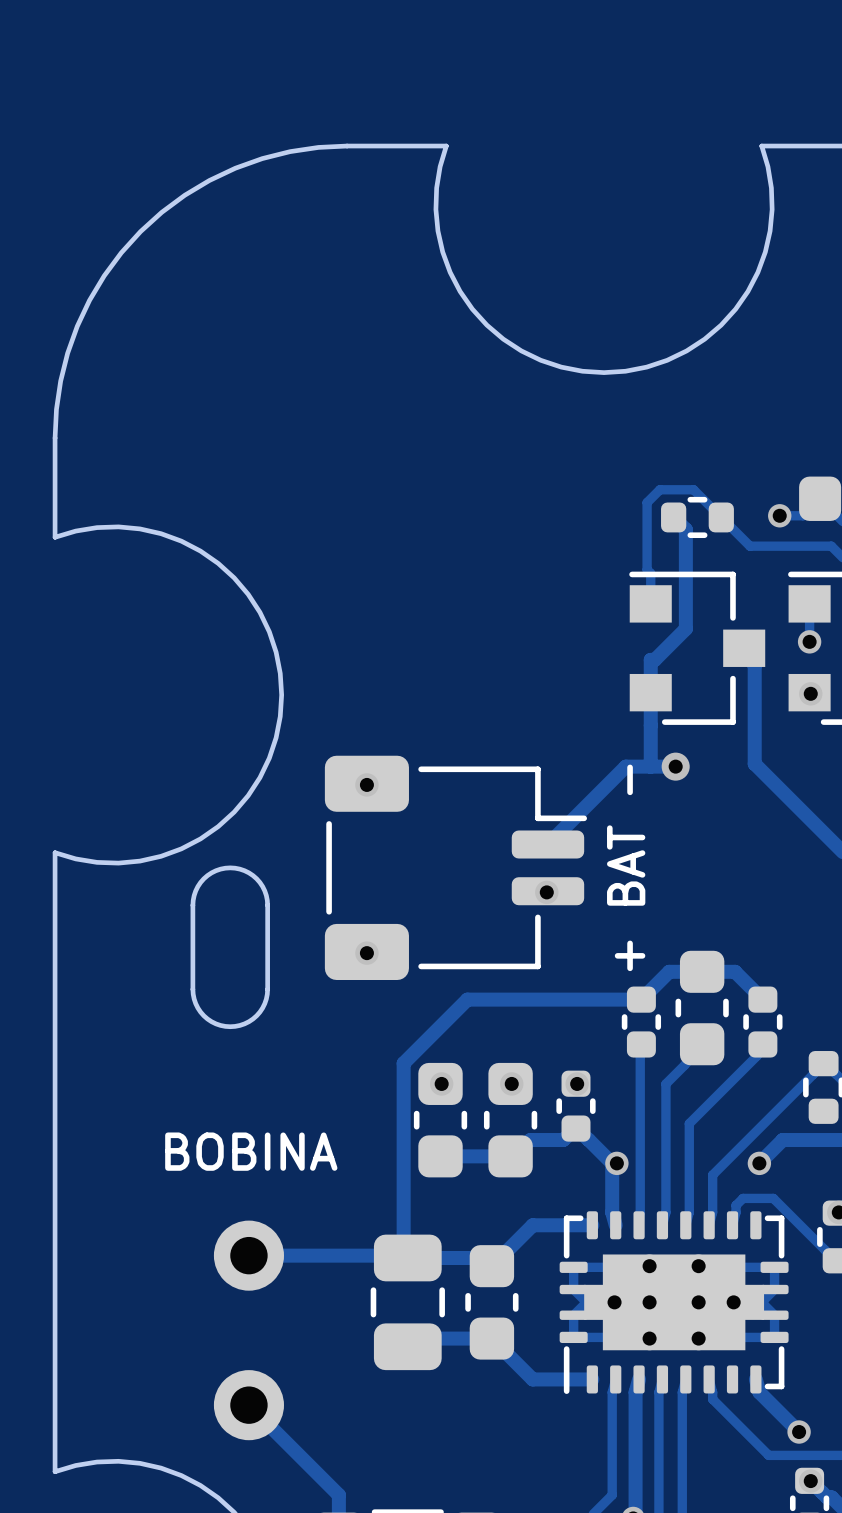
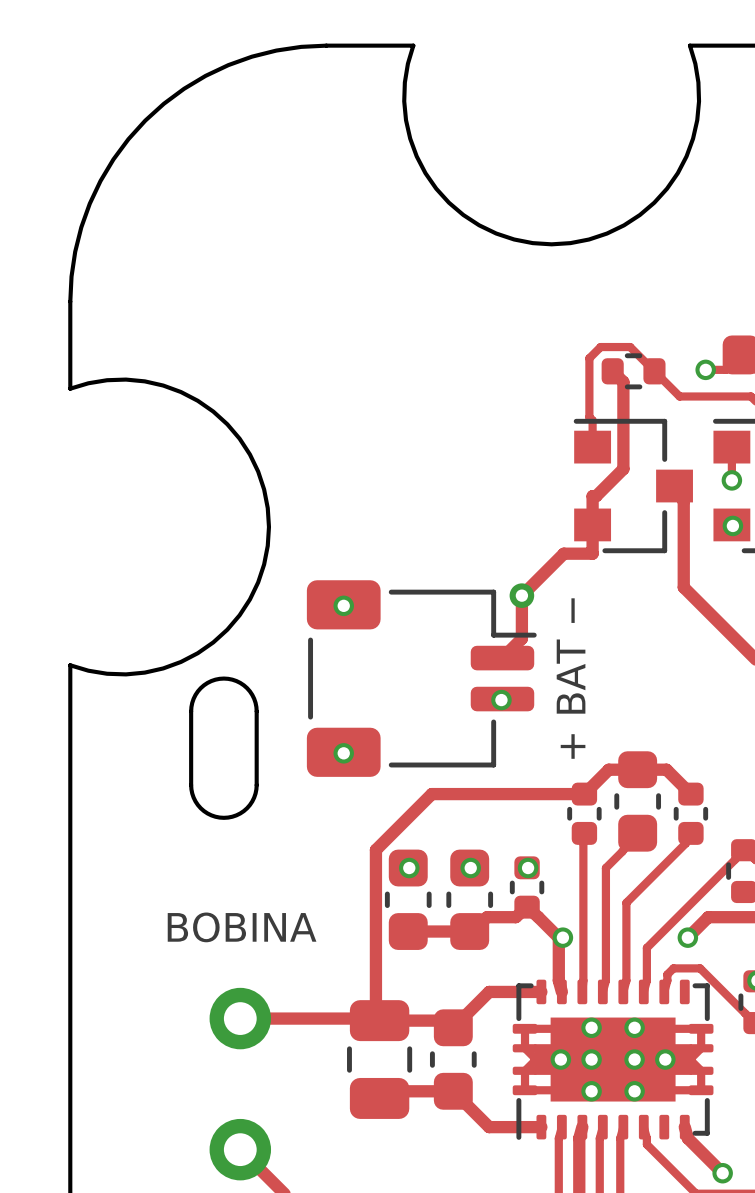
track: (650, 725) (650, 766) -> none
track: (675, 766) (625, 766) (570, 822) -> (592, 553) (563, 553) (521, 595) (521, 638)
via position: (675, 766) -> (521, 595)

